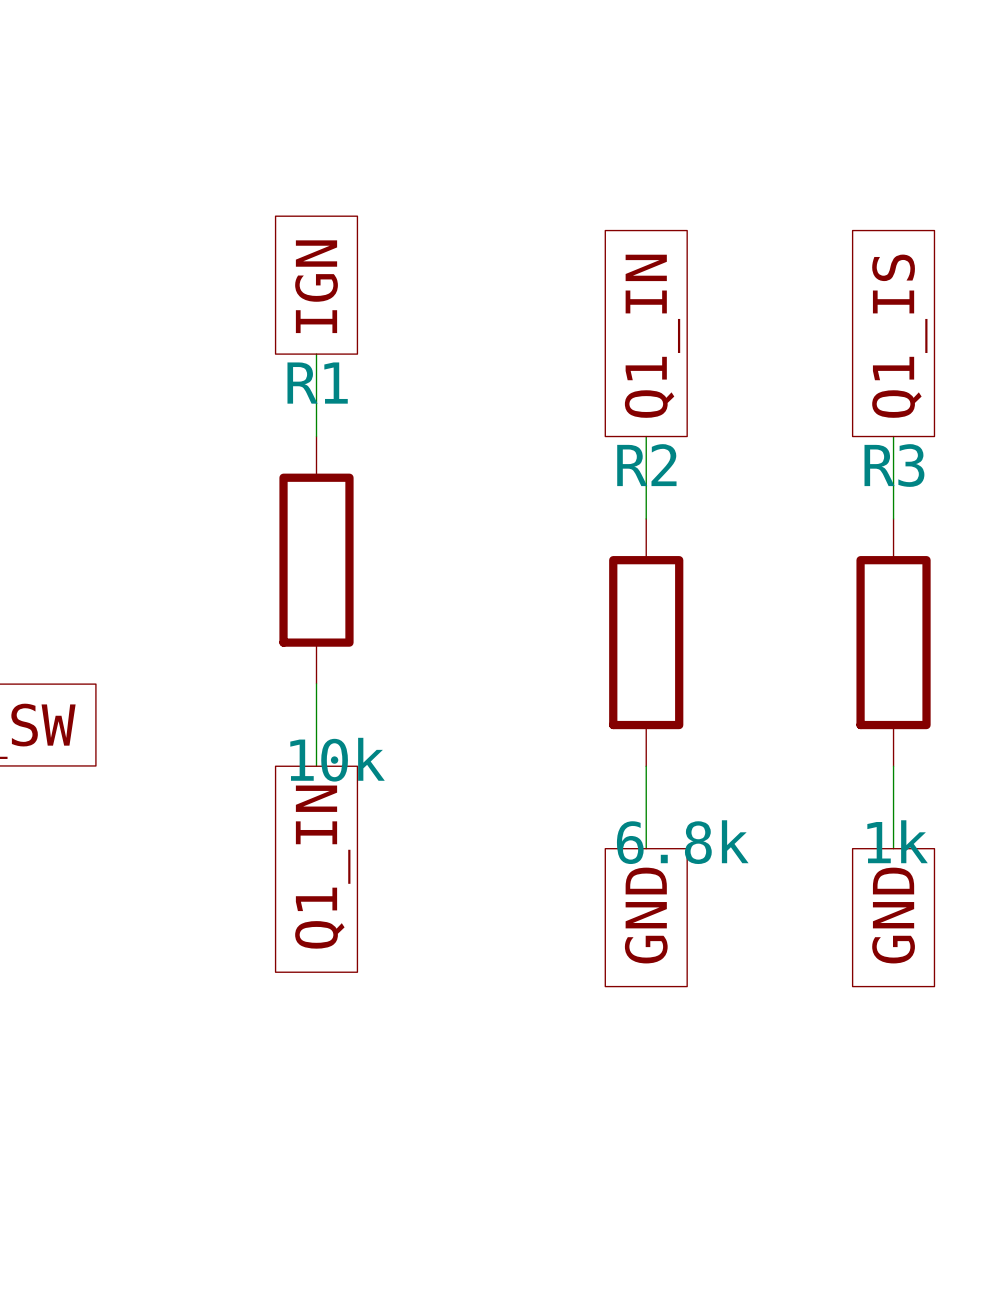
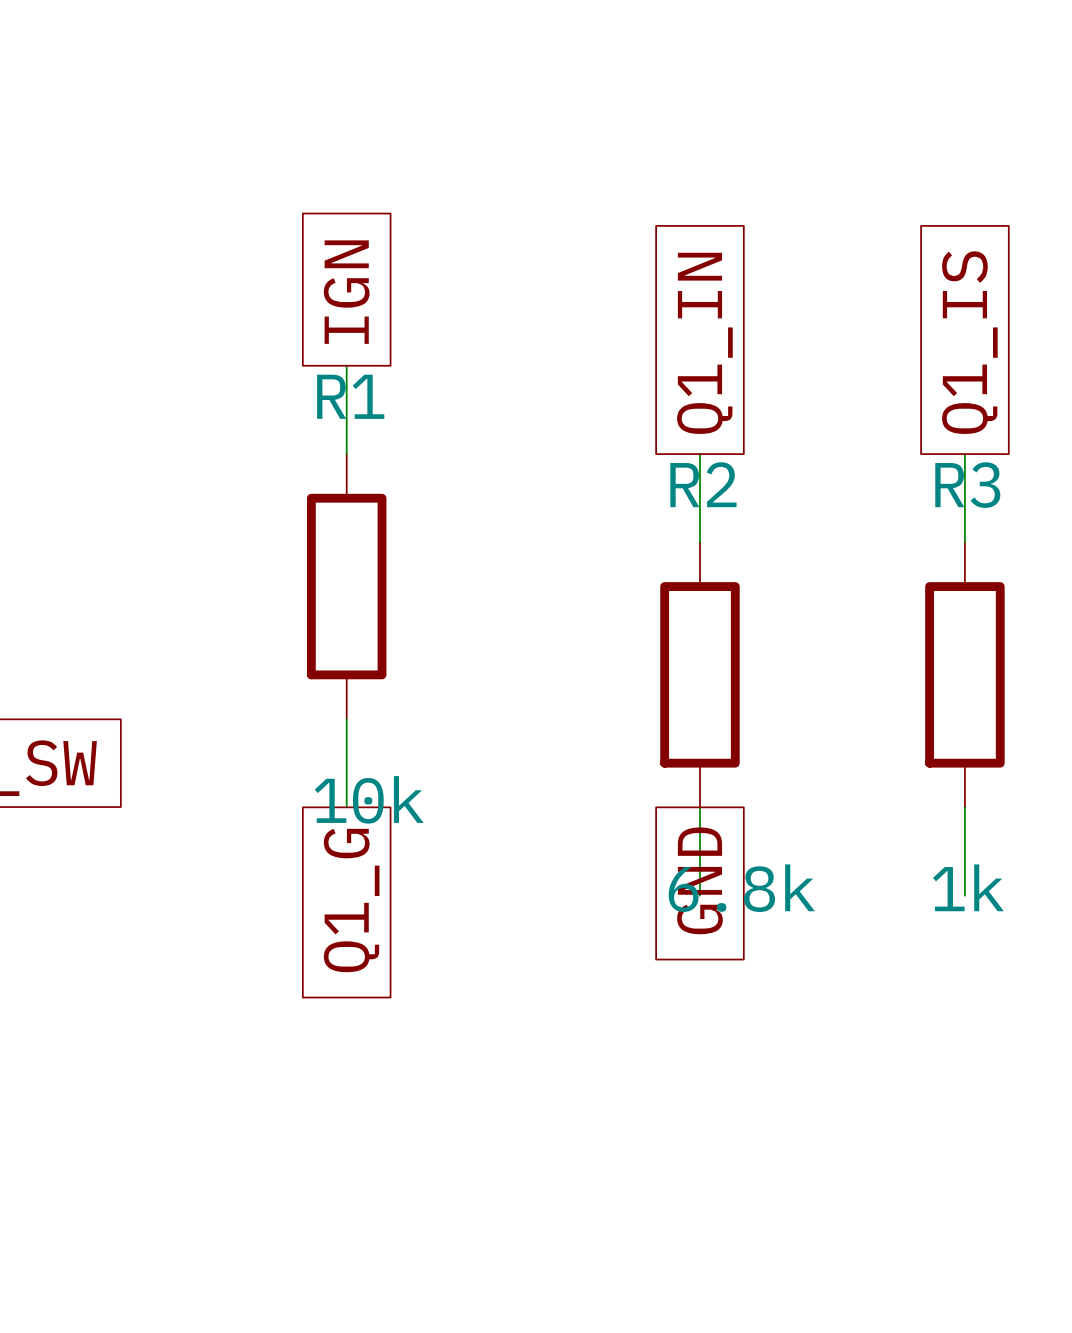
global label: Q1_IN (322, 867) -> Q1_G (351, 900)
global label position: GND (646, 915) -> GND (699, 880)
global label: GND (893, 915) -> none

